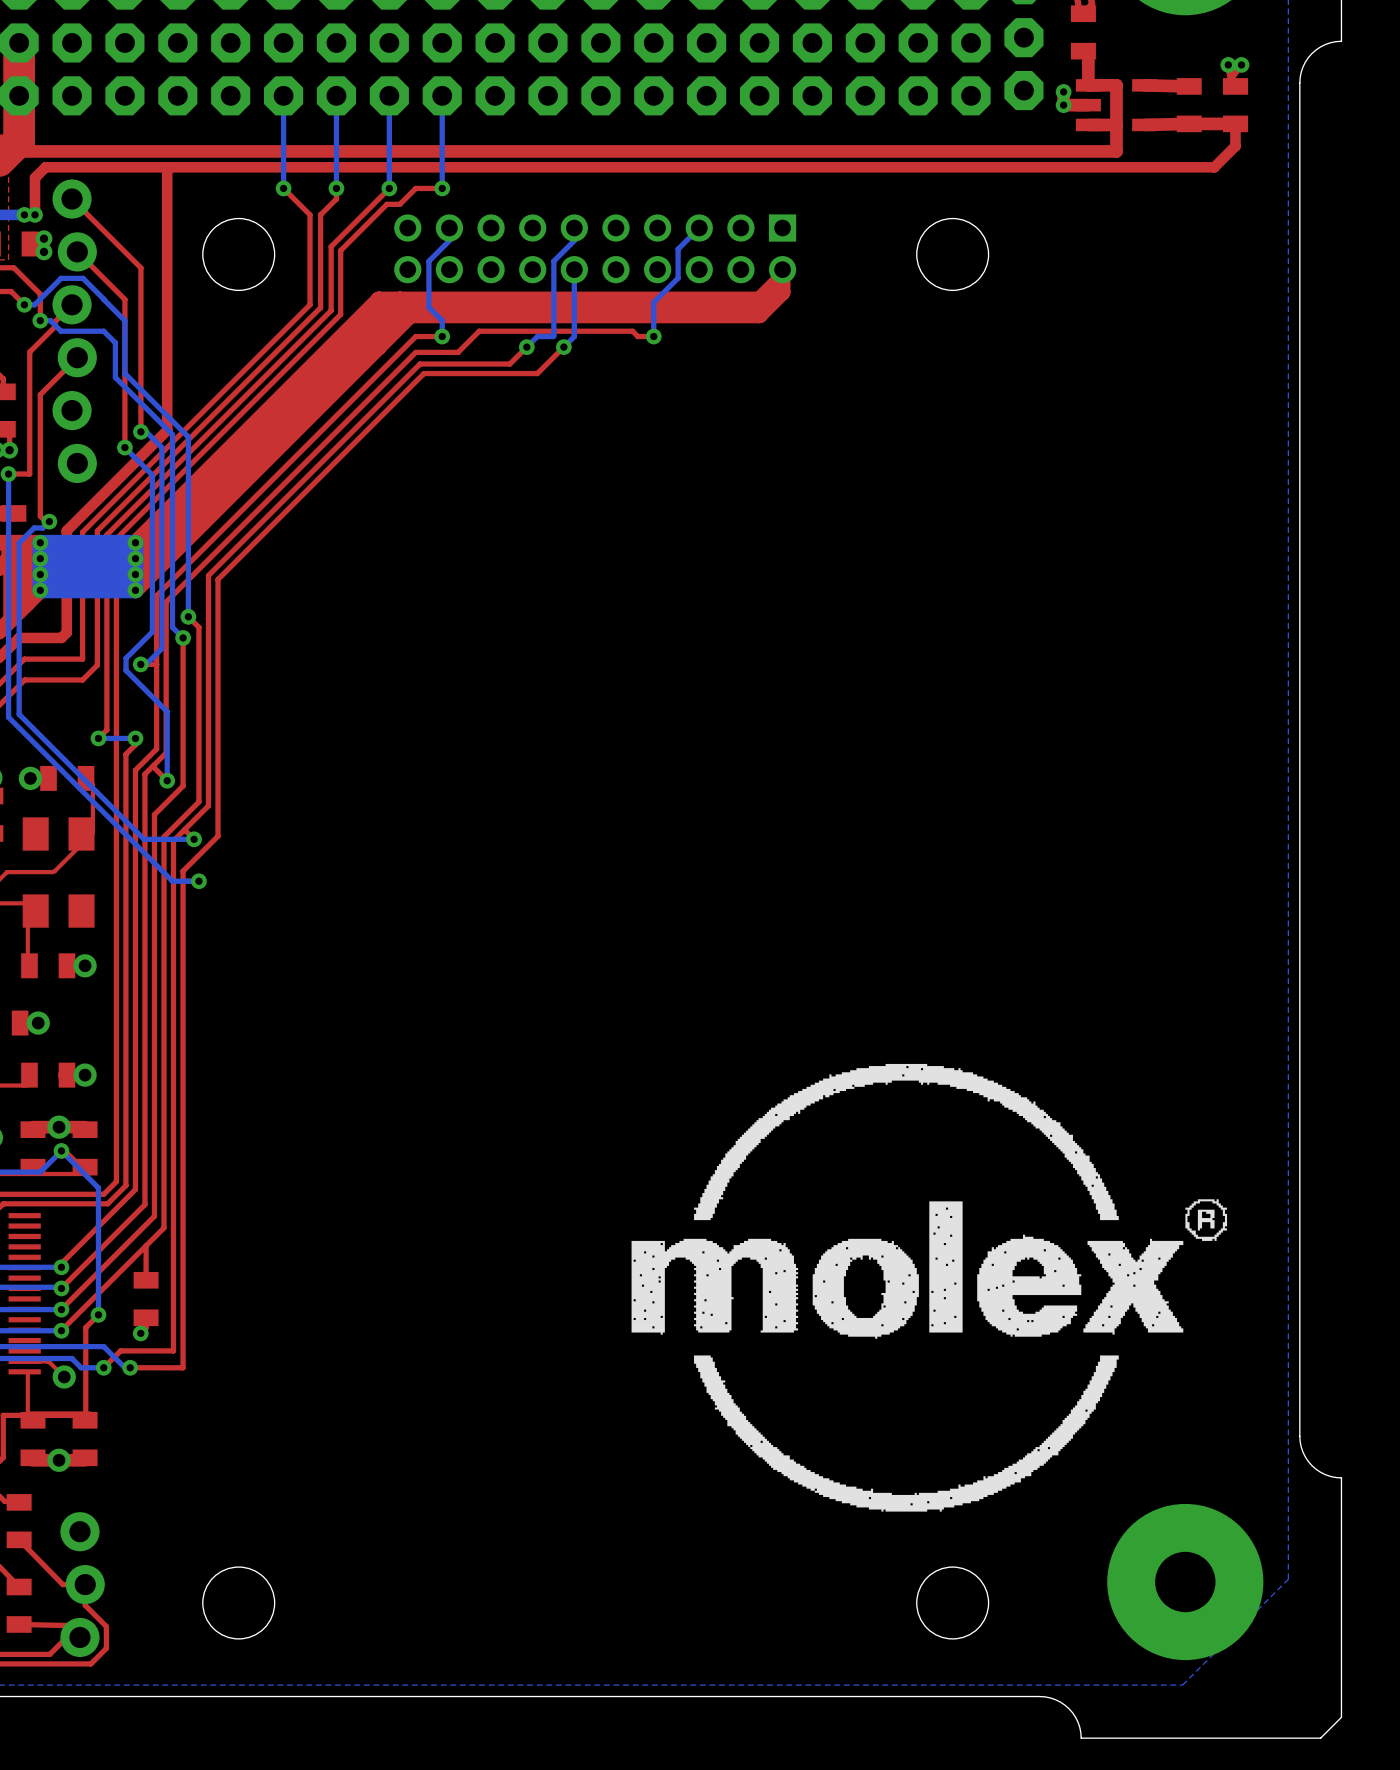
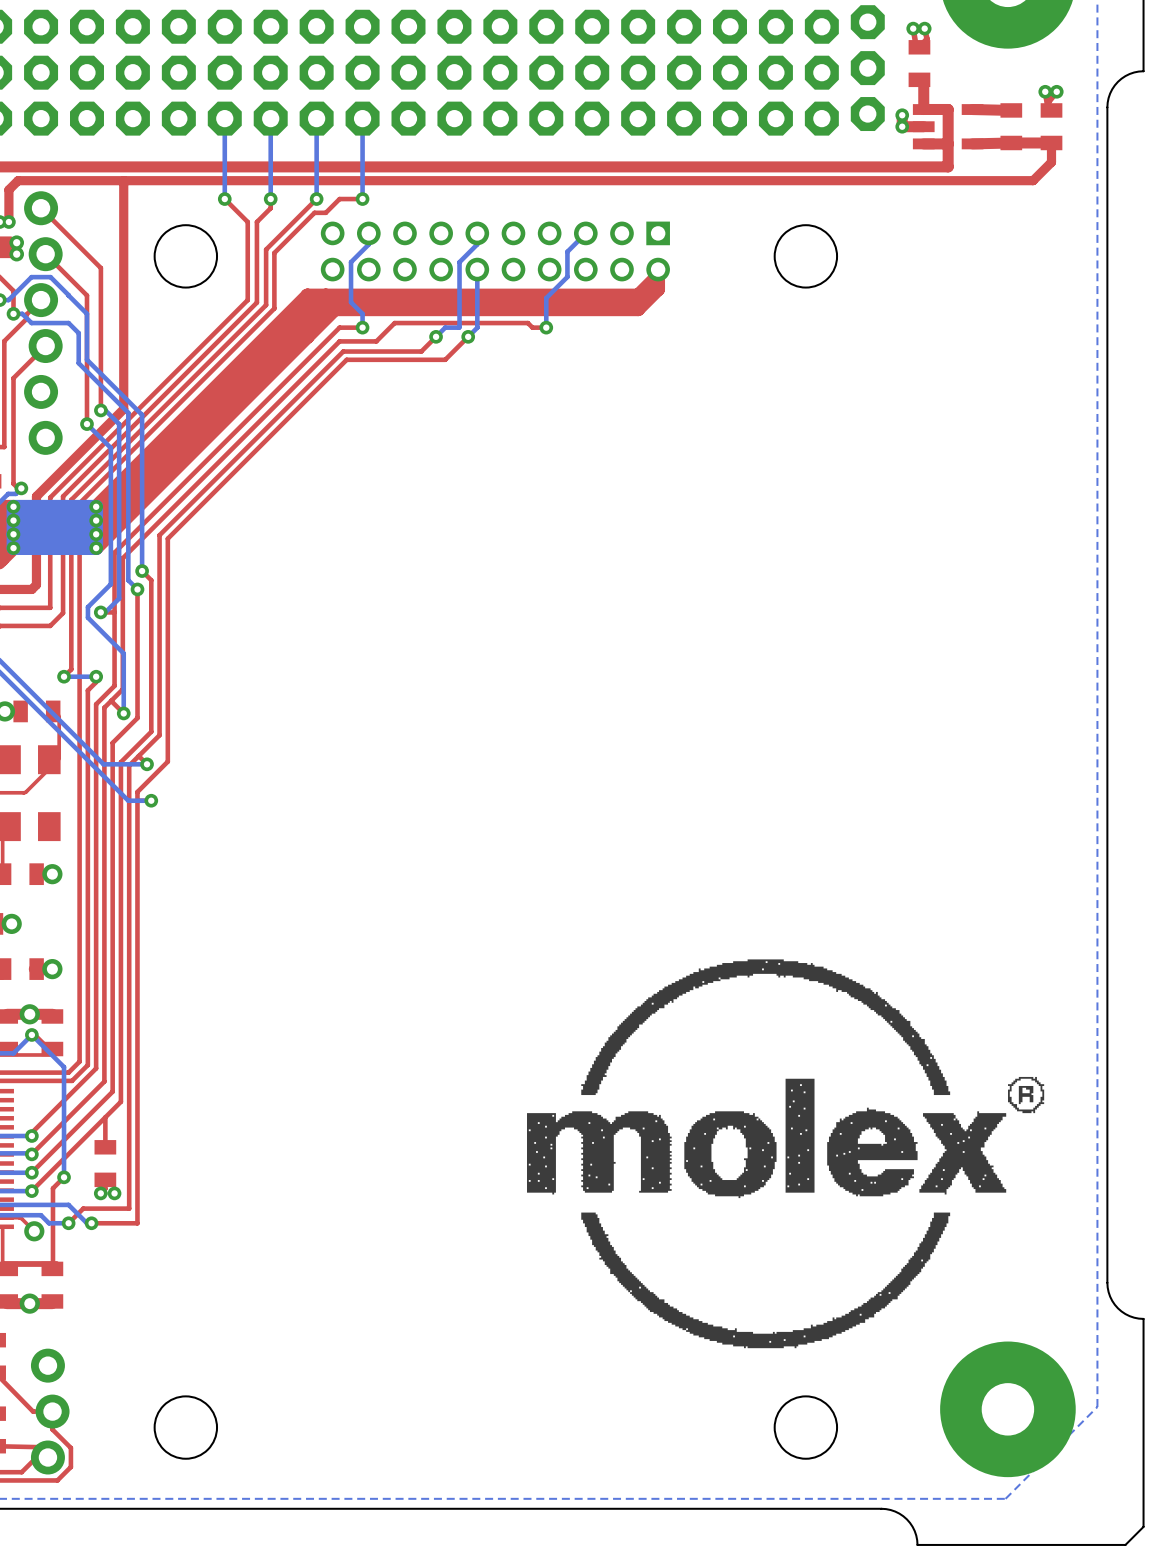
via: none -> (114, 1193)

